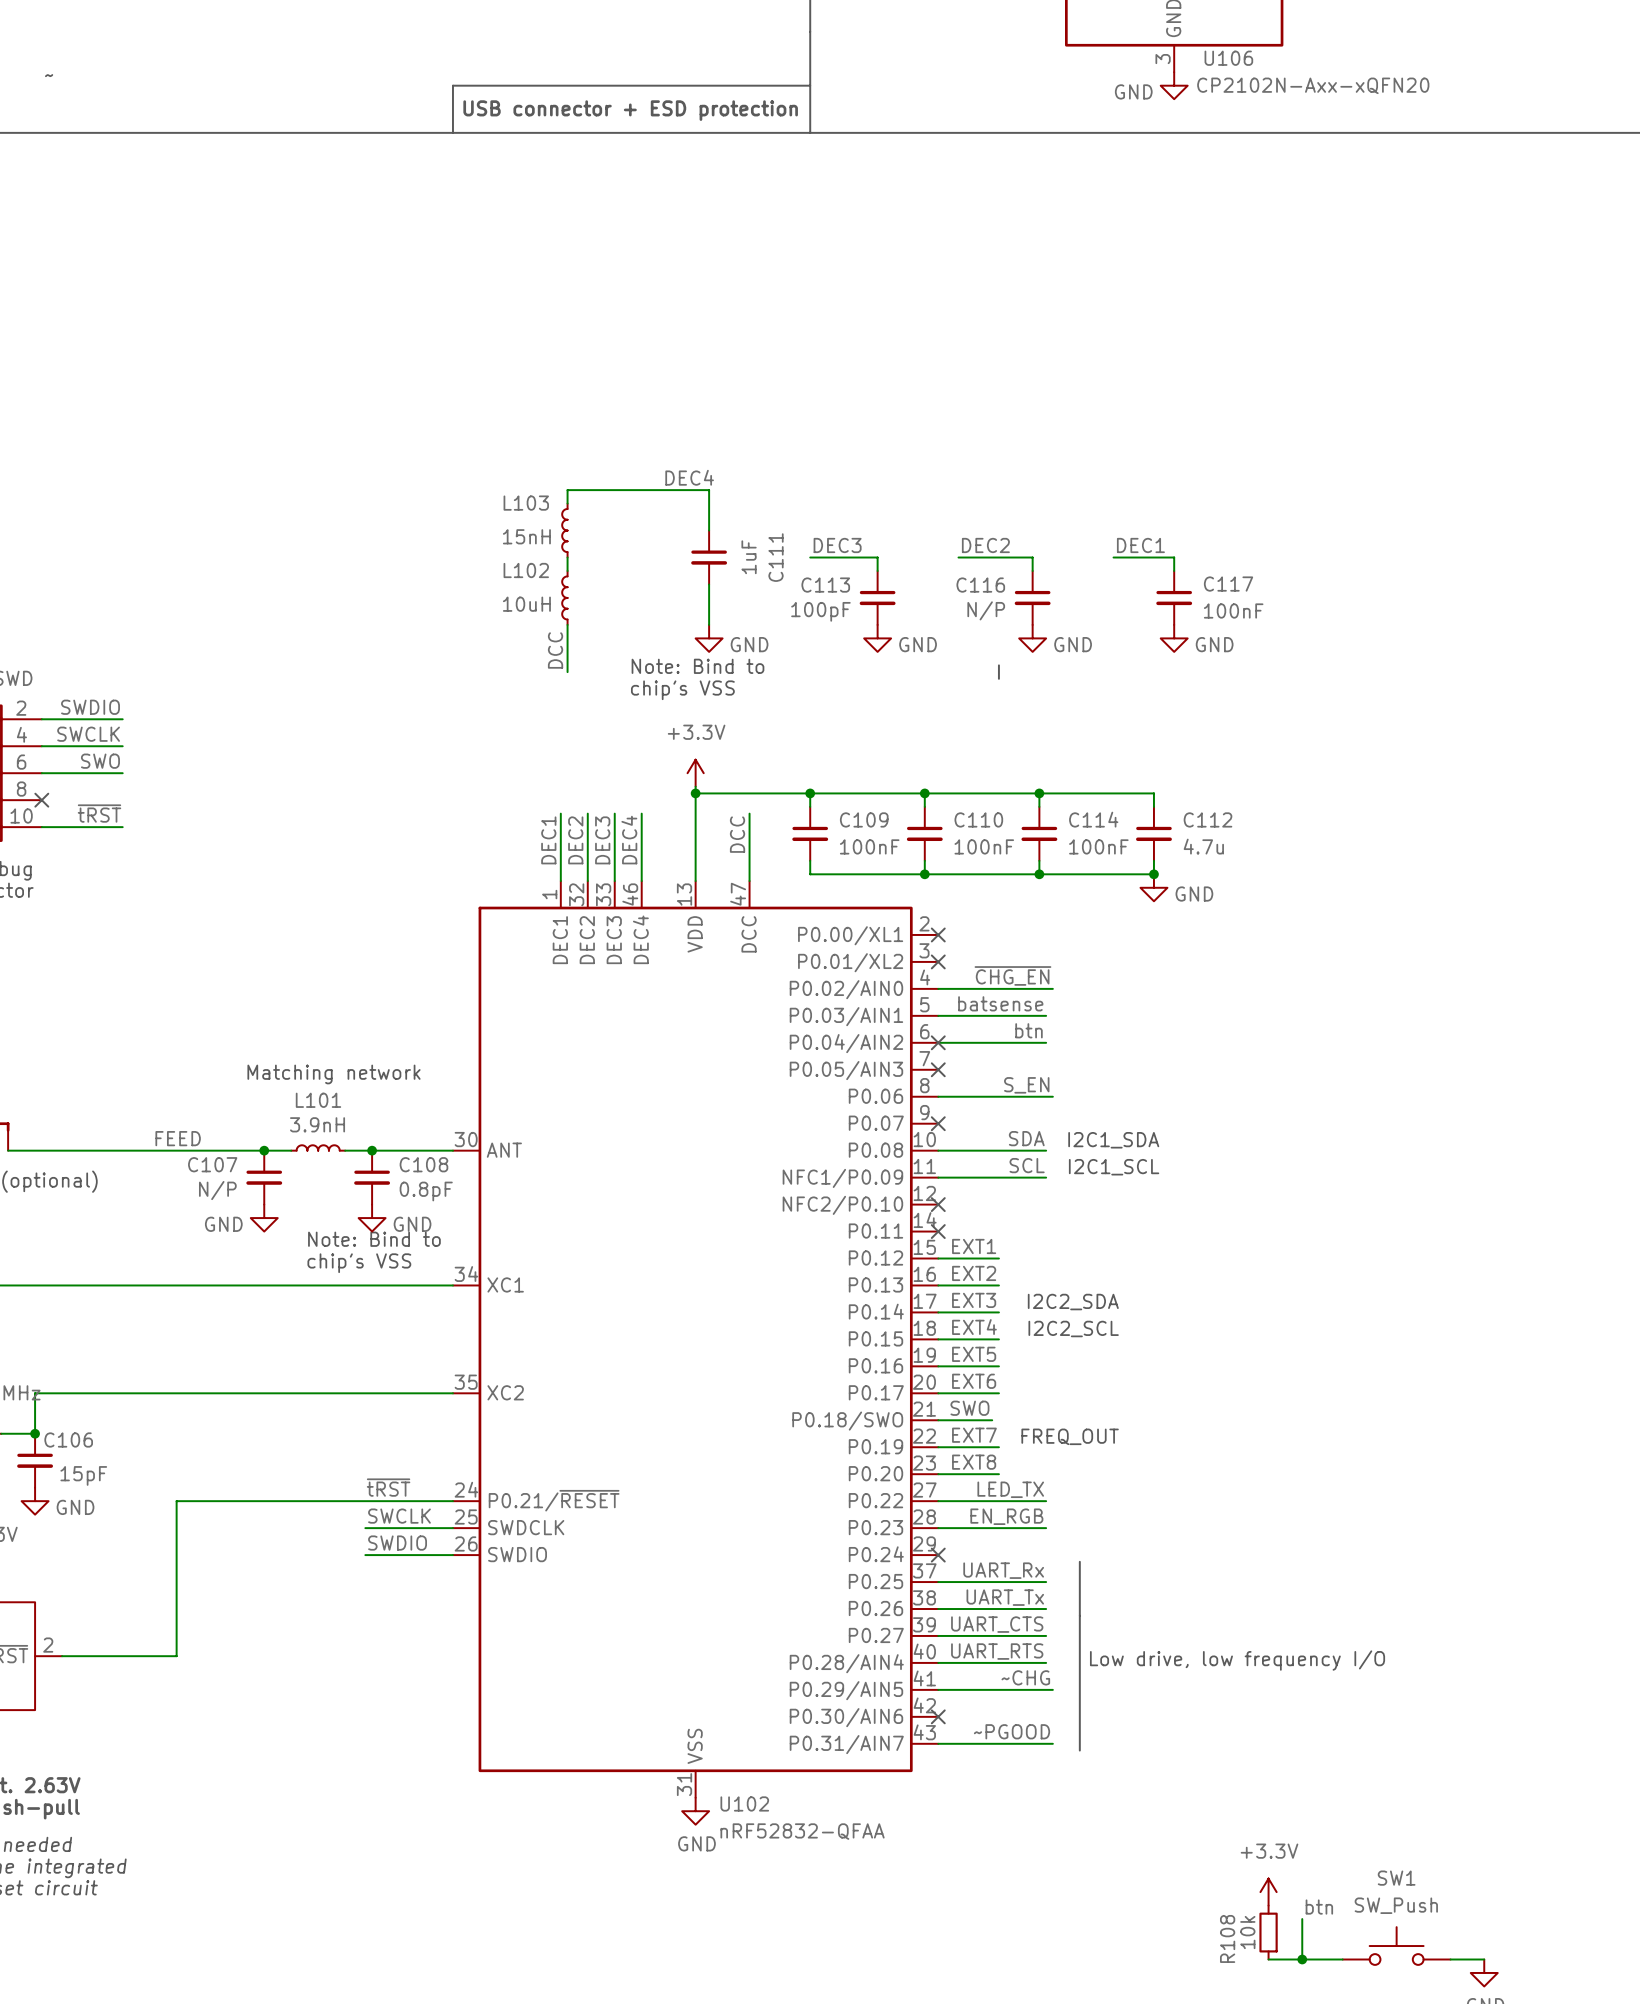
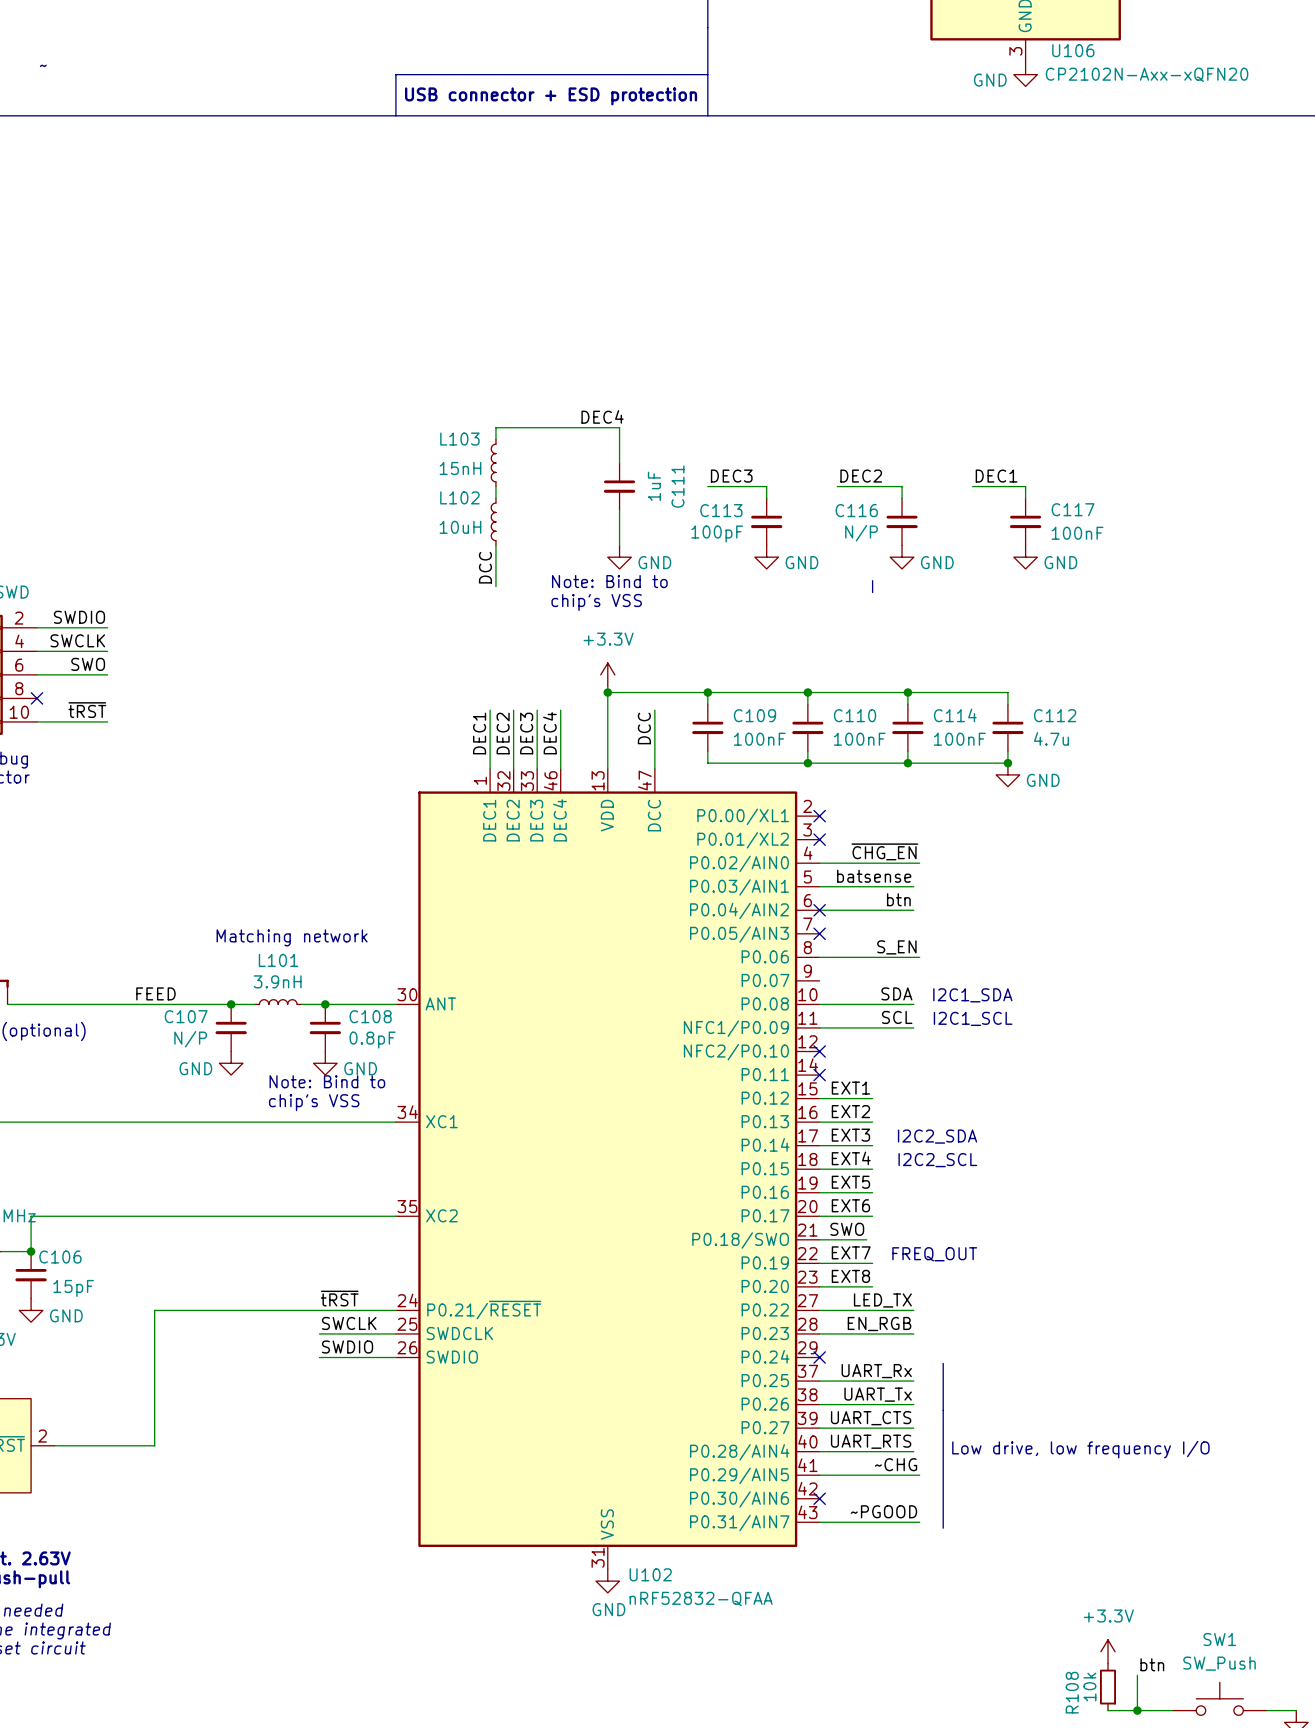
no-connect mark: (938, 1123) -> none

